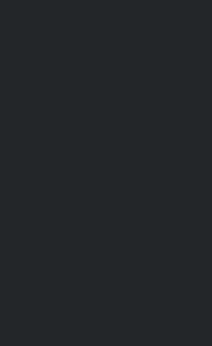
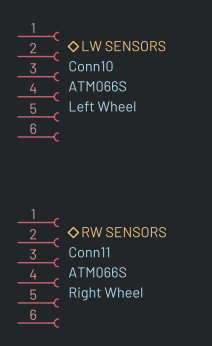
hierarchical label: none -> LW SENSORS (123, 46)
Conn10: none -> ATM066S (38, 86)
hierarchical label: none -> RW SENSORS (124, 232)
Conn11: none -> ATM066S (38, 272)

